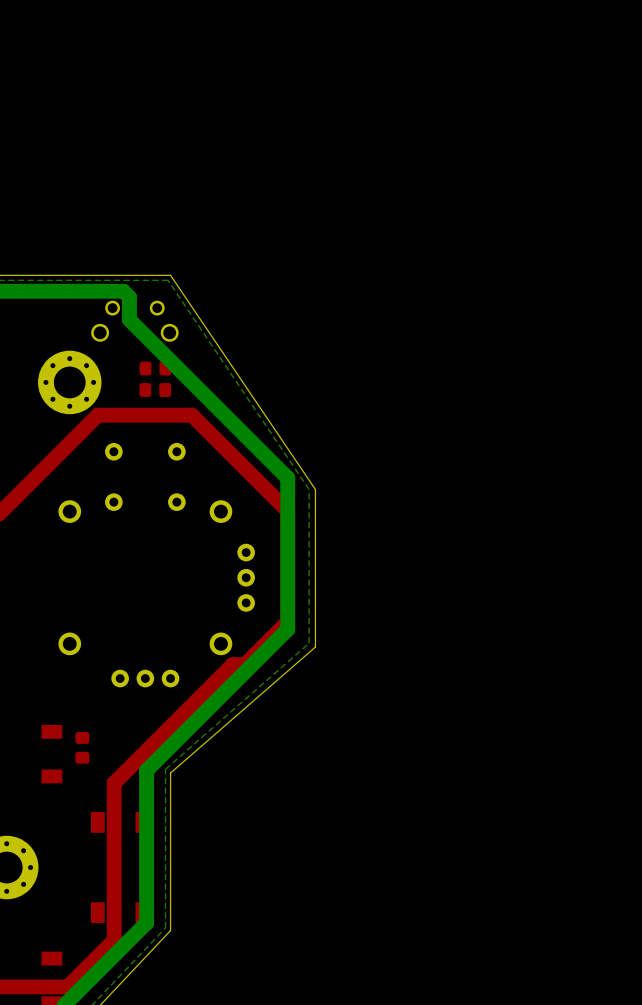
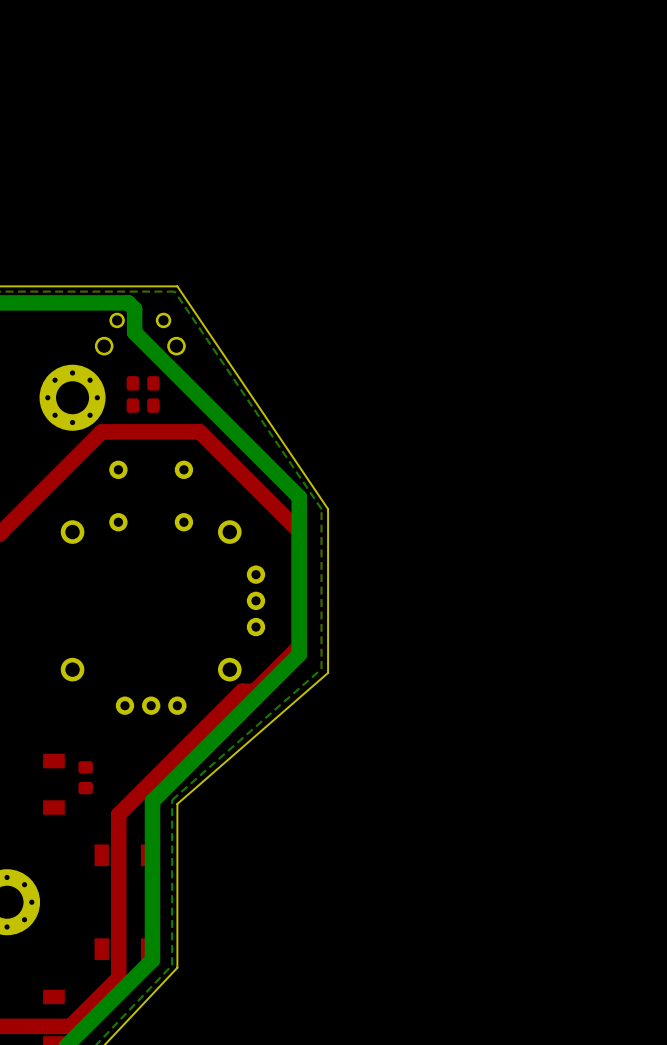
part: none -> (143, 383)
part: (155, 368) -> none
part: none -> (143, 405)
part: (155, 390) -> none

